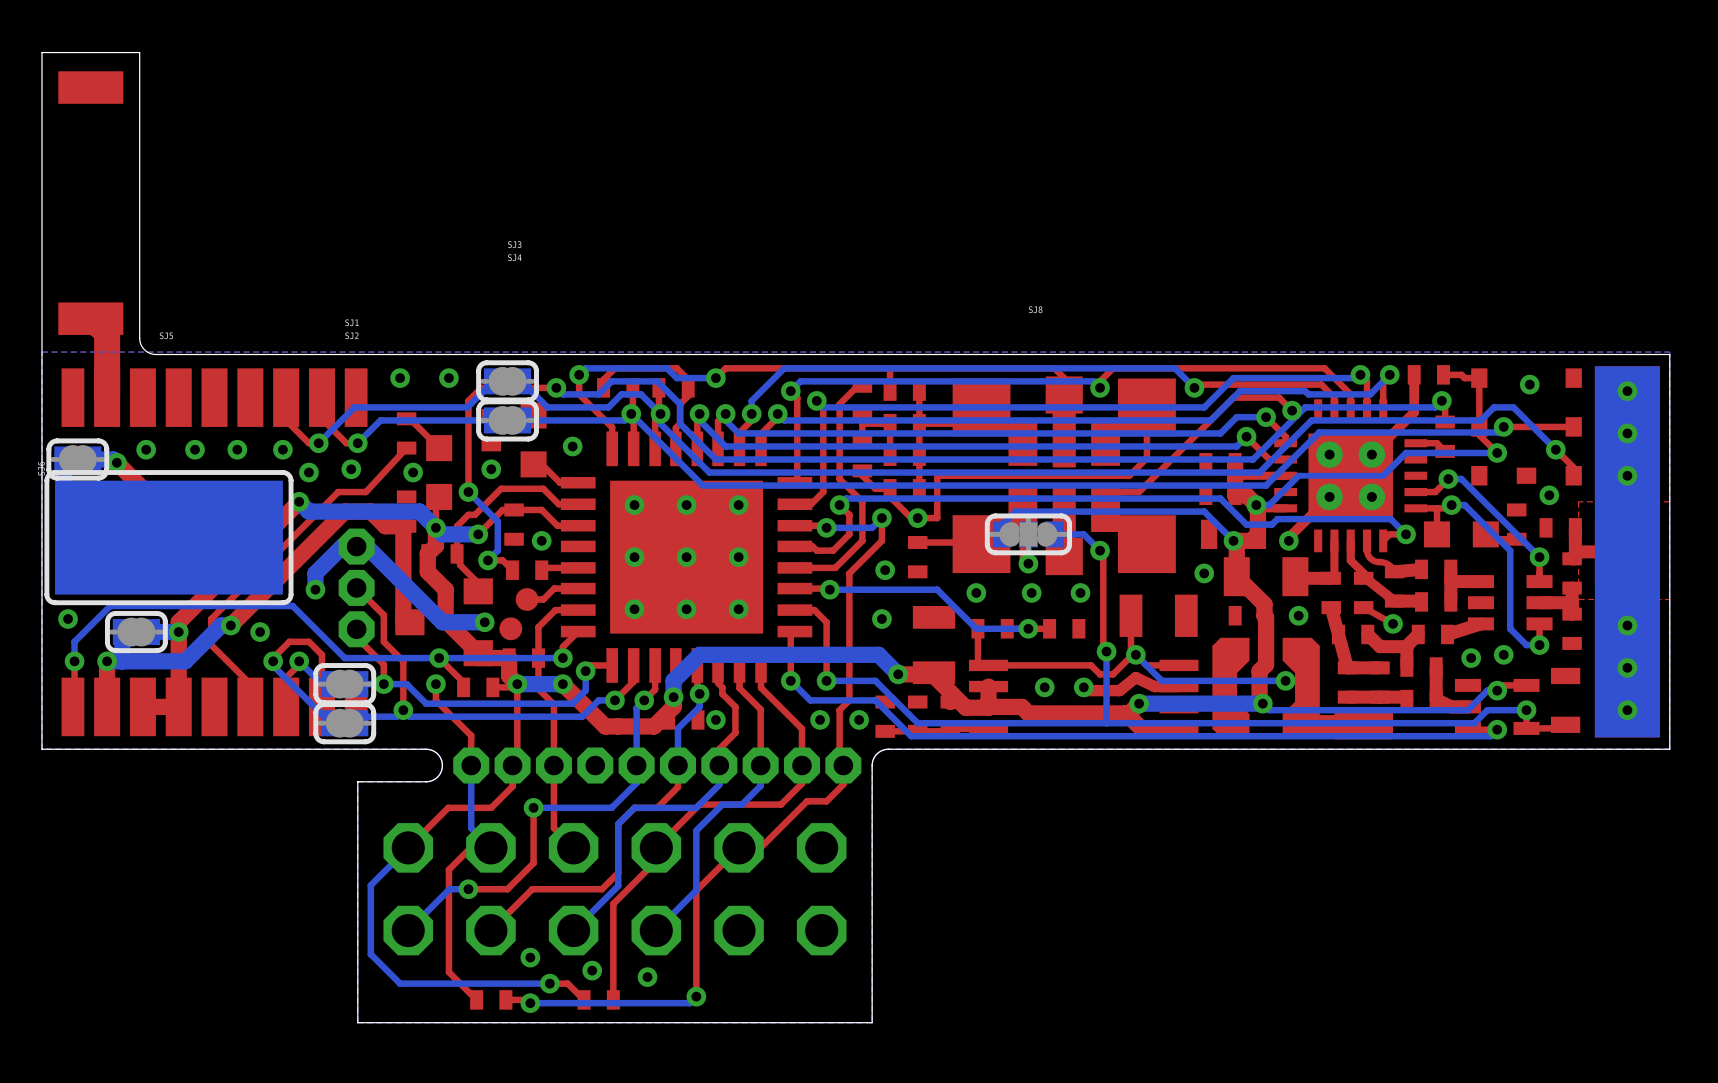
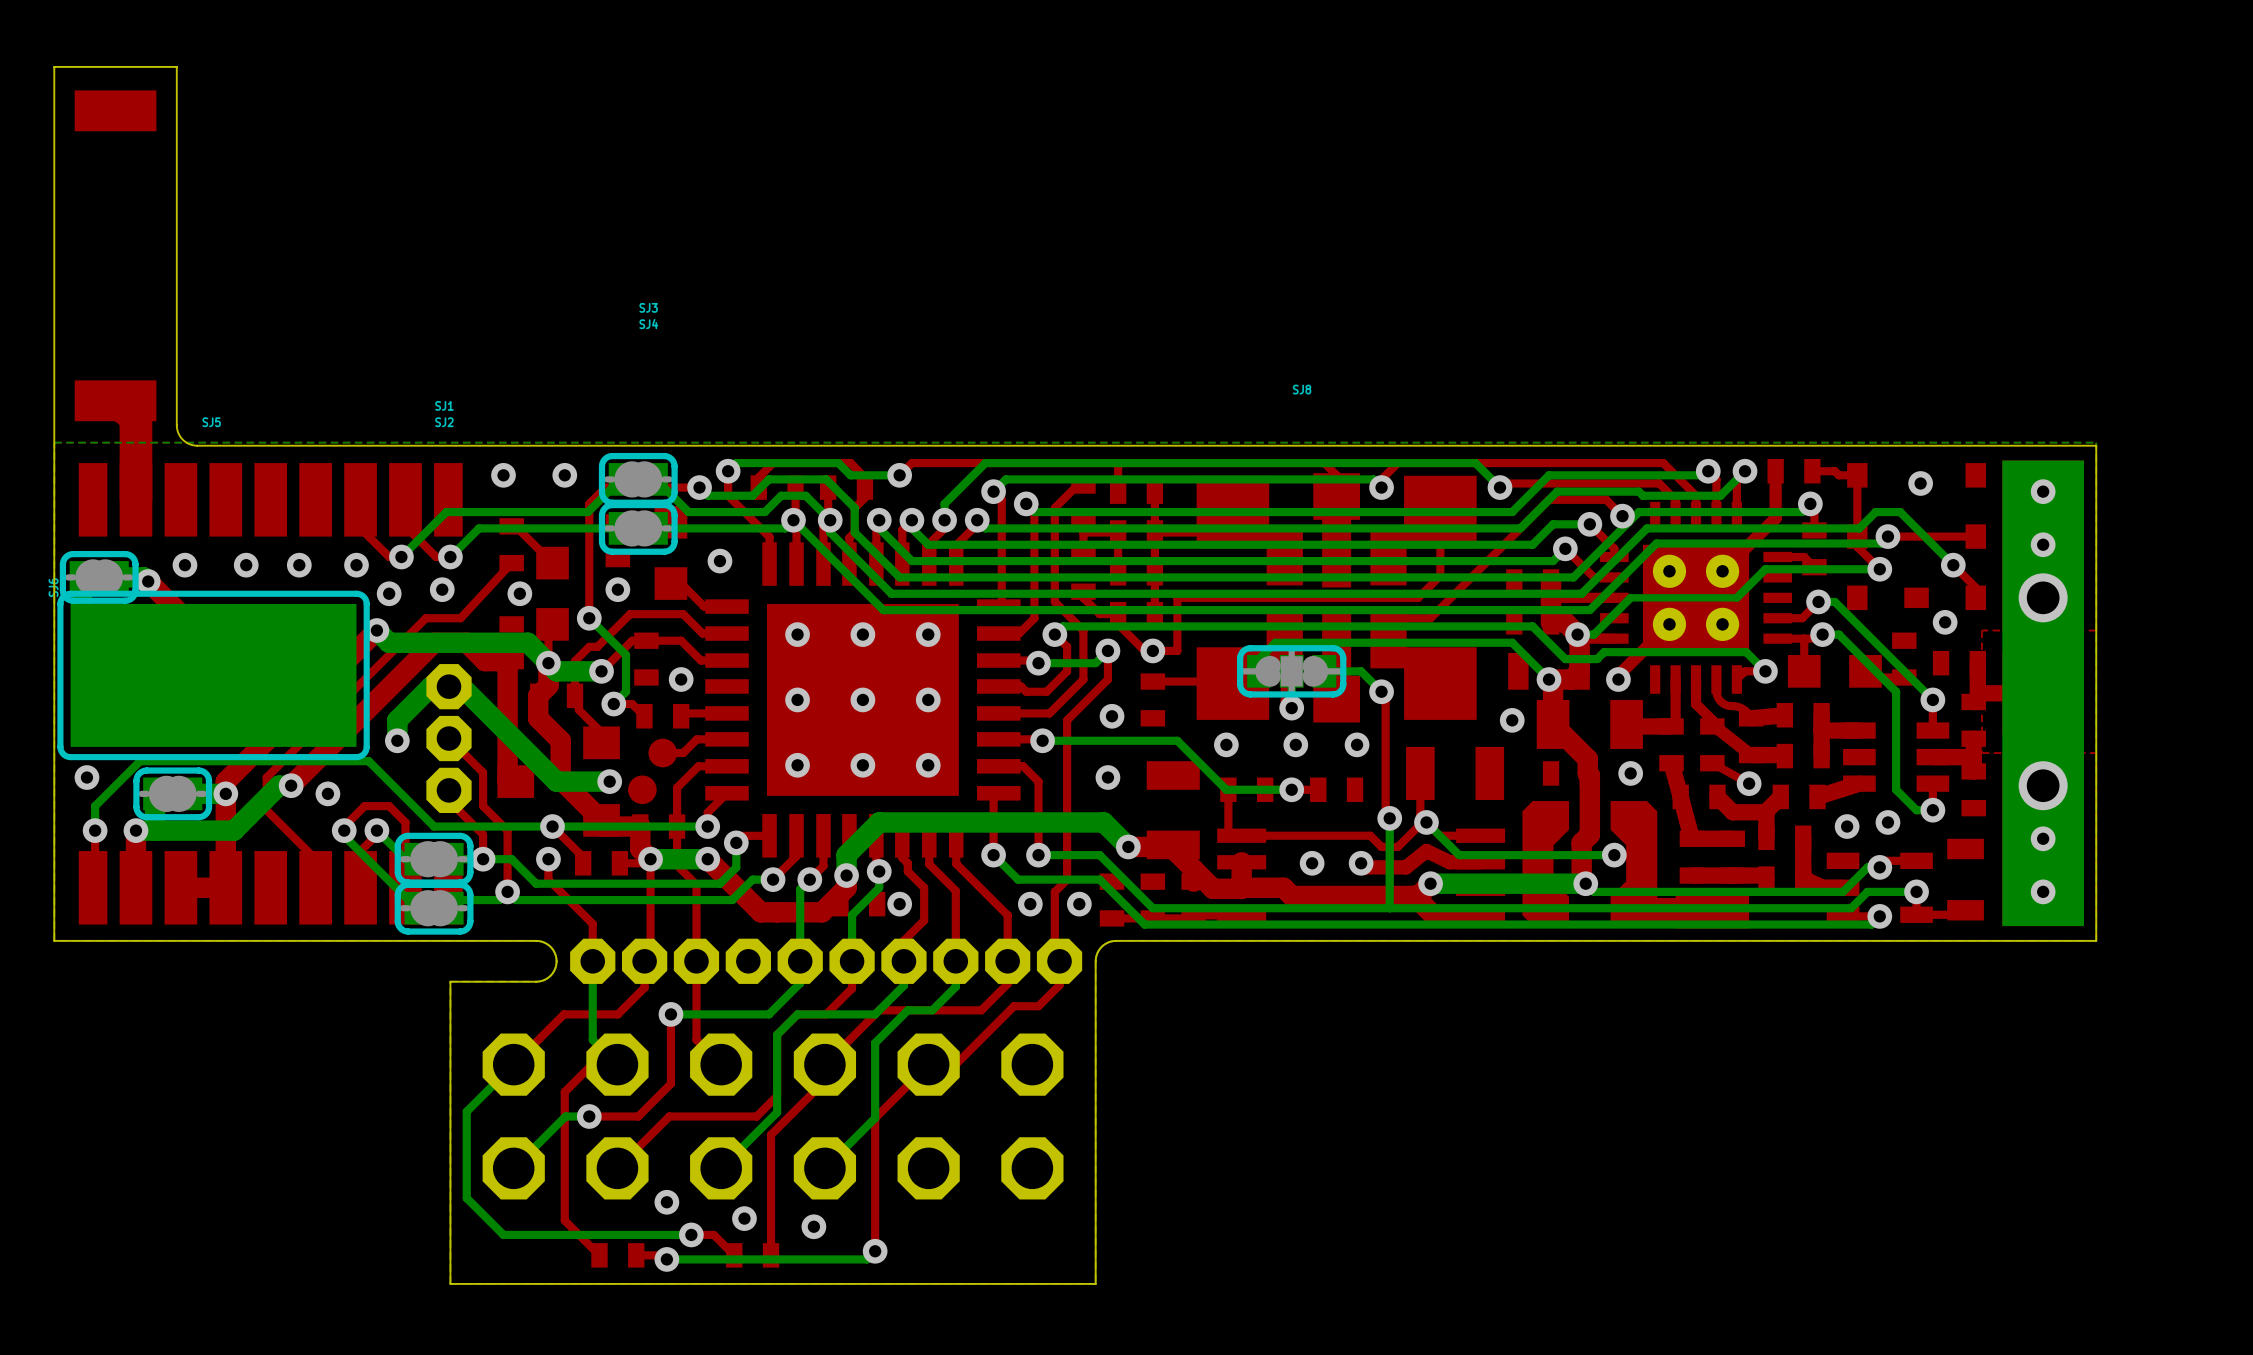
via size: [1617, 465, 1638, 486] -> [2018, 573, 2068, 623]
via size: [1617, 615, 1638, 636] -> [2018, 761, 2068, 811]

